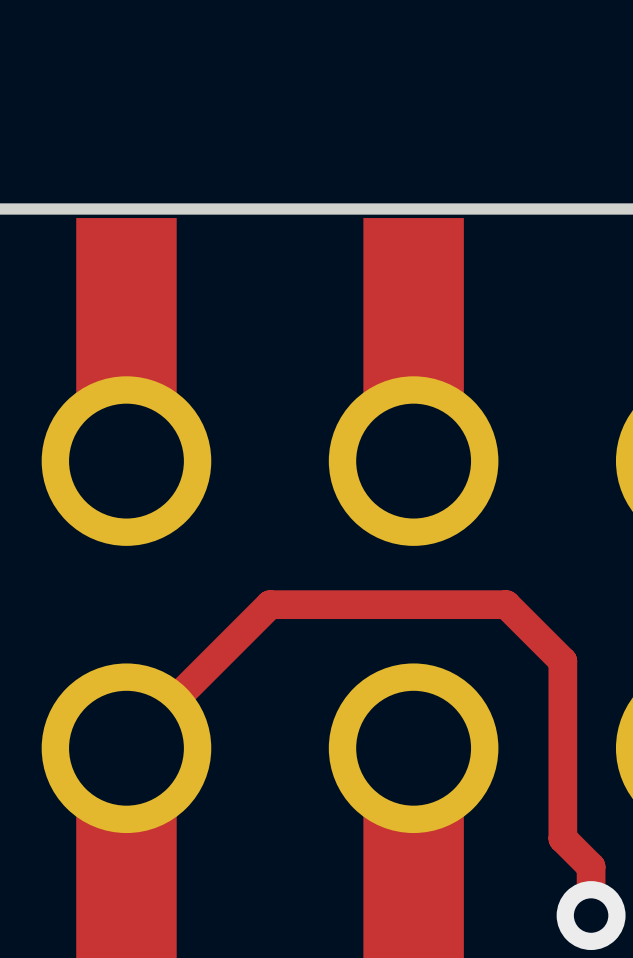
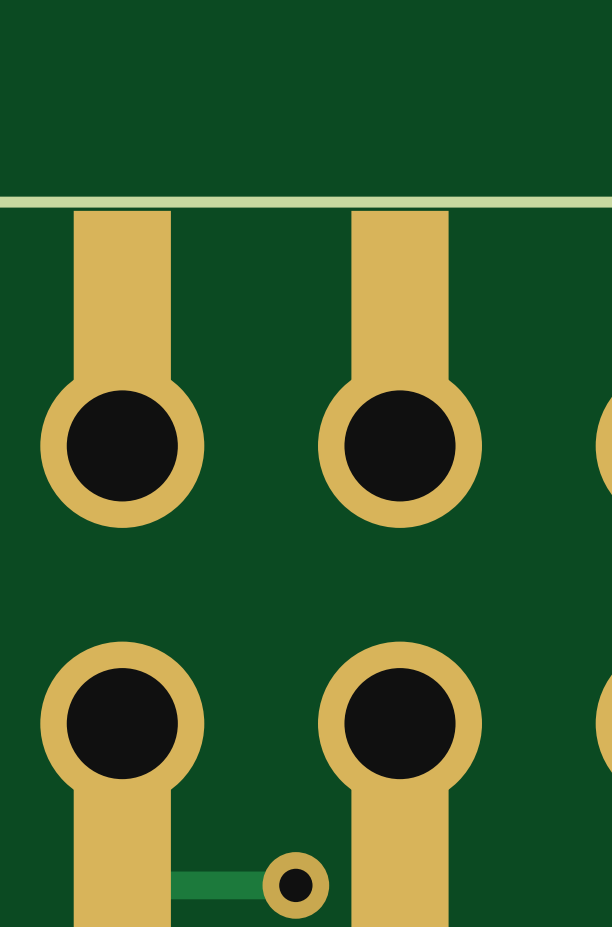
track: (126, 748) (270, 604) (506, 604) (562, 661) (562, 838) (591, 866) (591, 915) -> none
track: none -> (122, 866) (140, 885) (295, 885)
via: none -> (295, 885)
via: (591, 915) -> none

